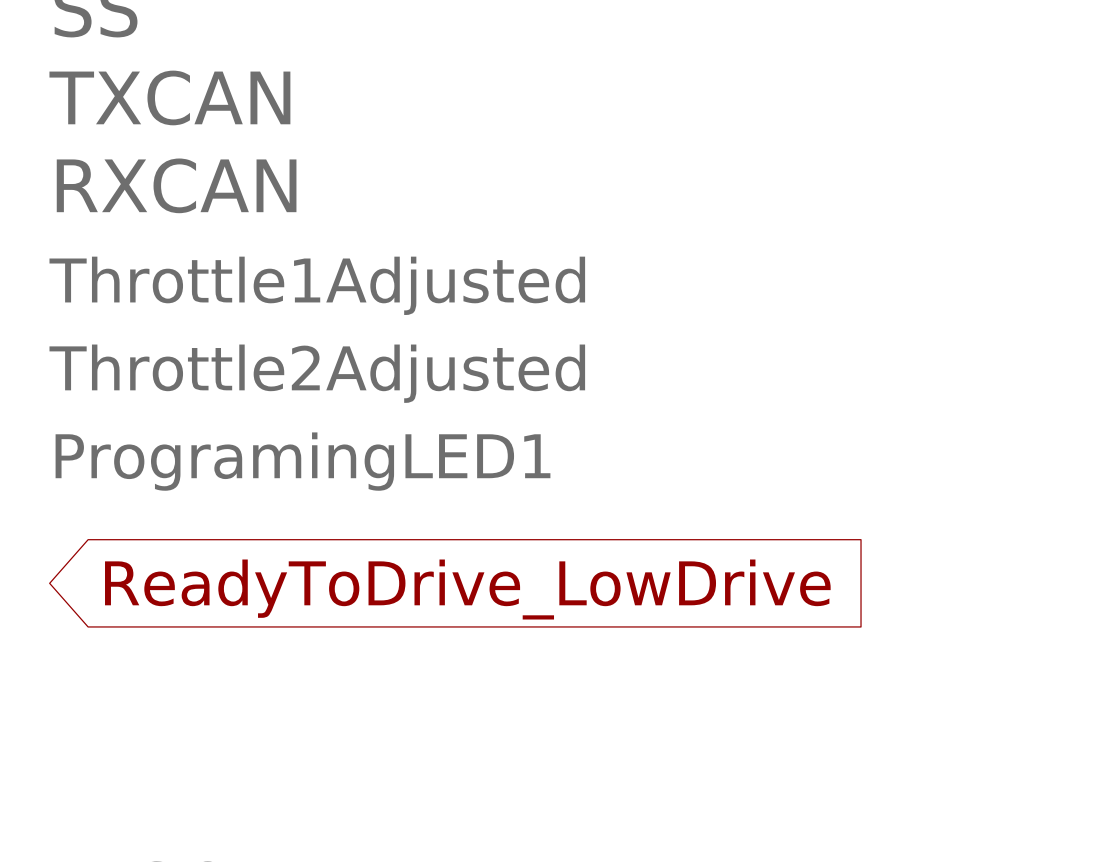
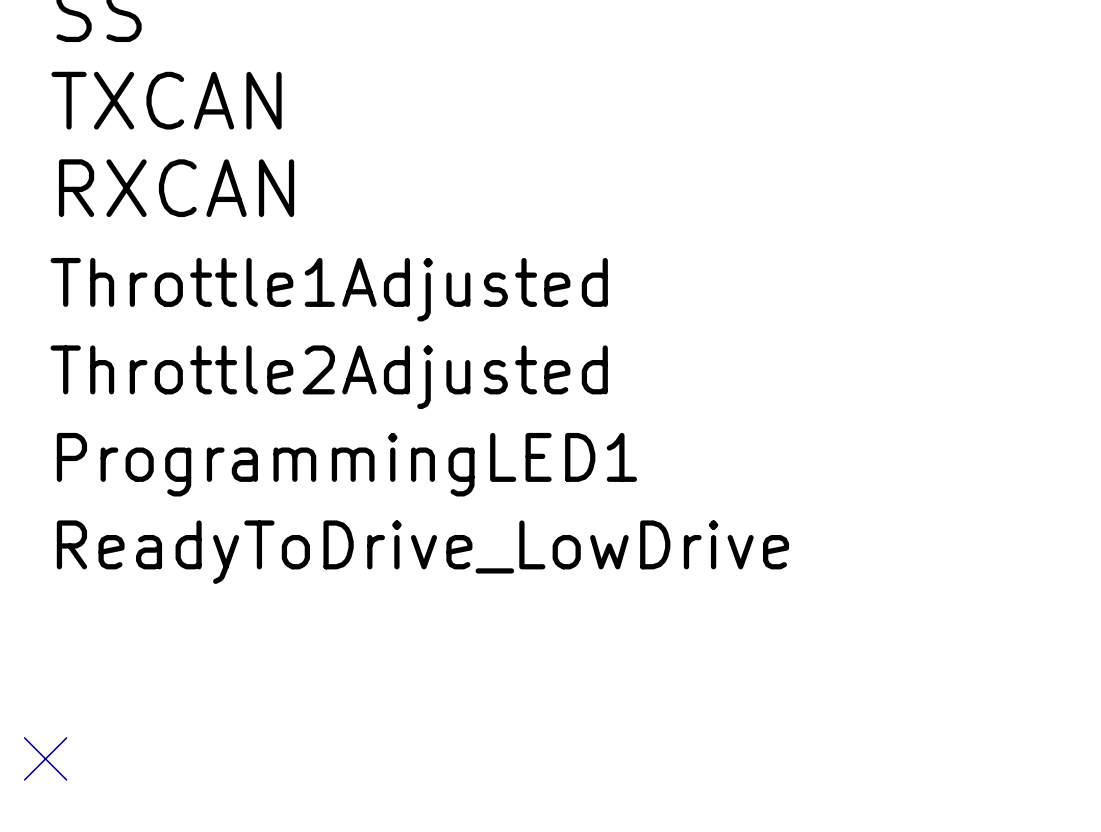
label: ProgramingLED1 (302, 461) -> ProgrammingLED1 (346, 464)
label: none -> ReadyToDrive_LowDrive (422, 552)
global label: ReadyToDrive_LowDrive (467, 589) -> none
no-connect mark: none -> (45, 758)

